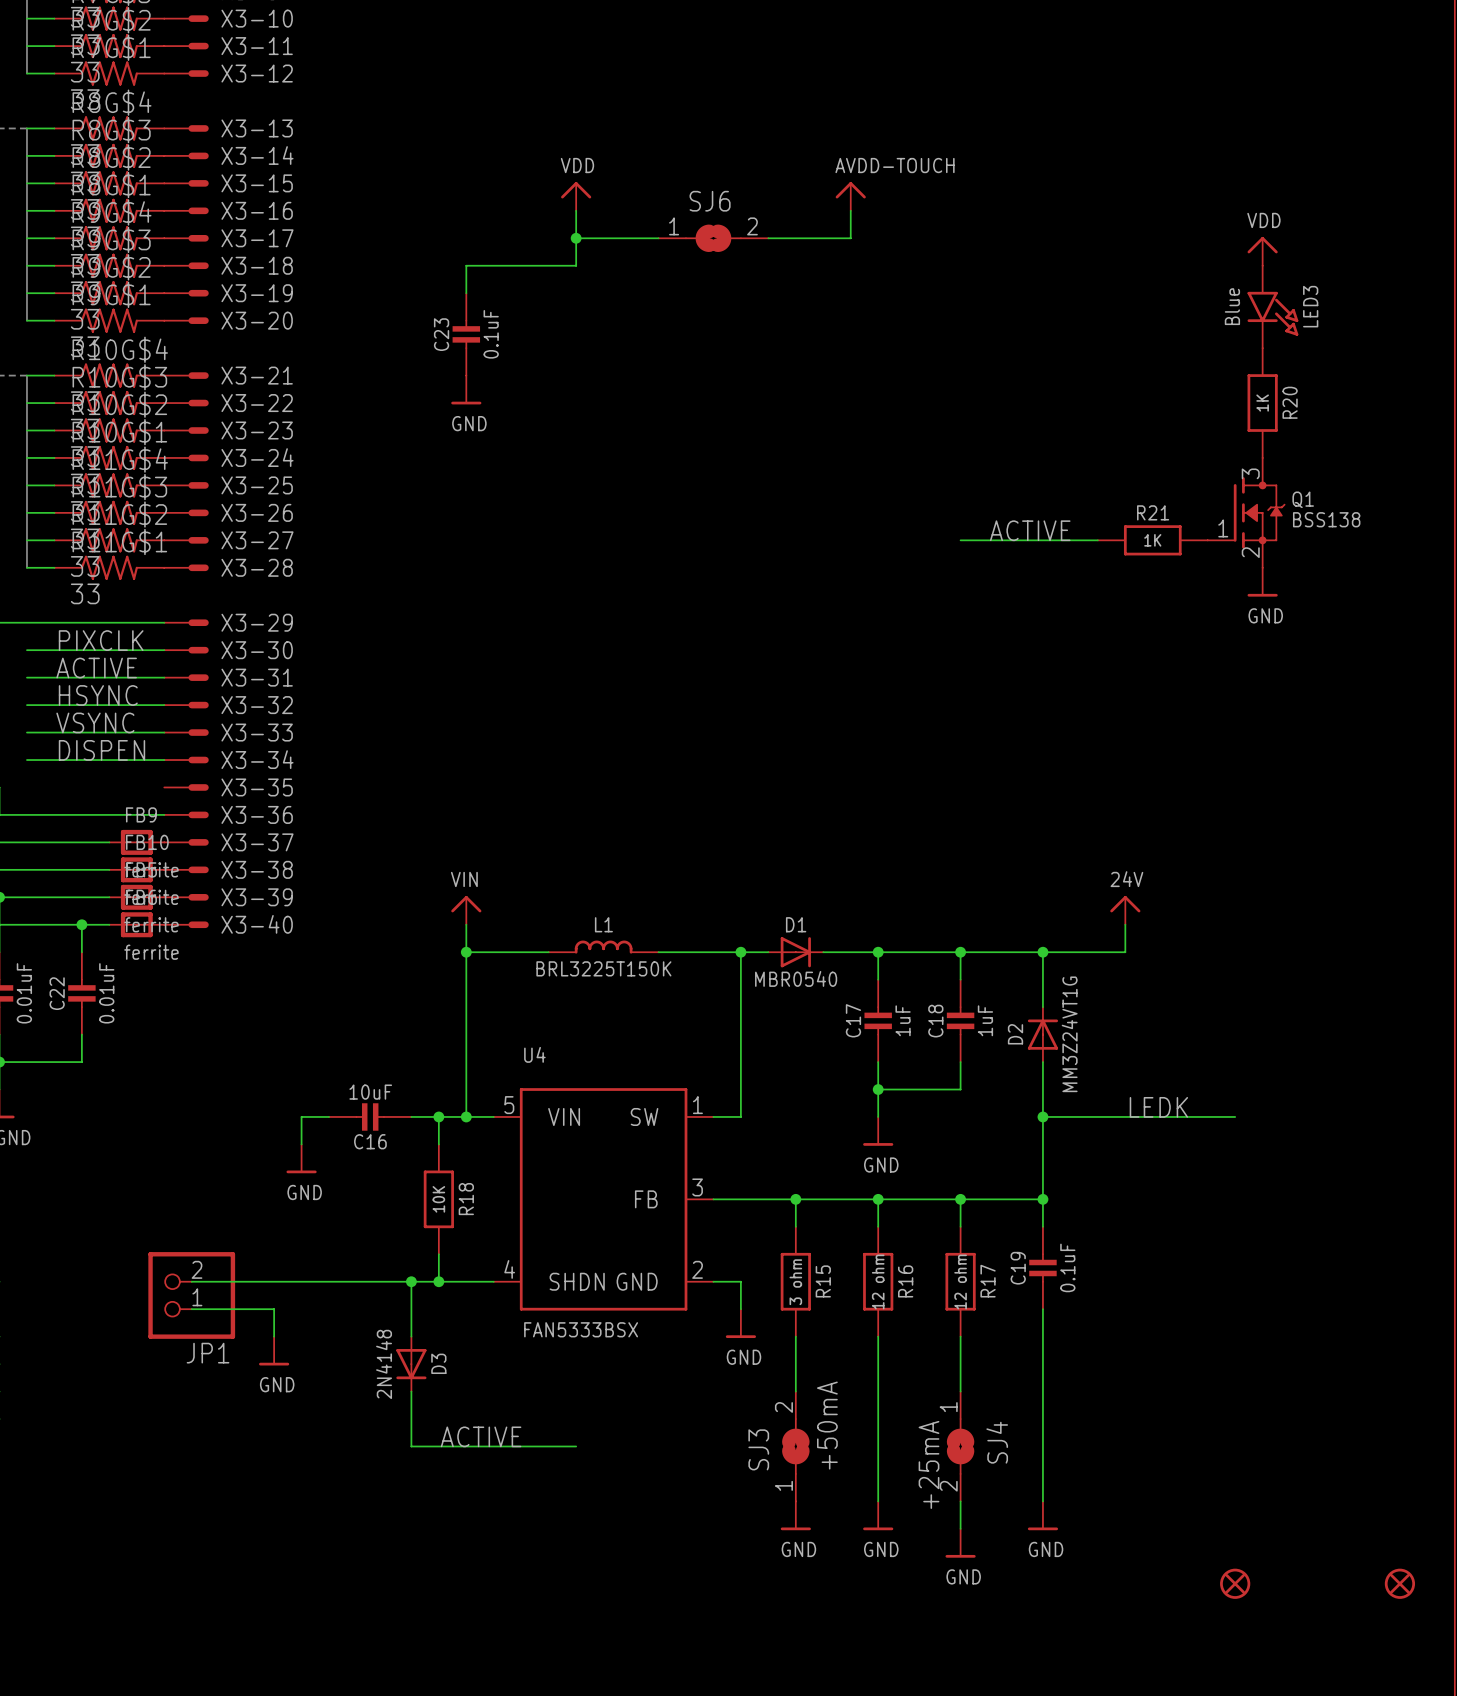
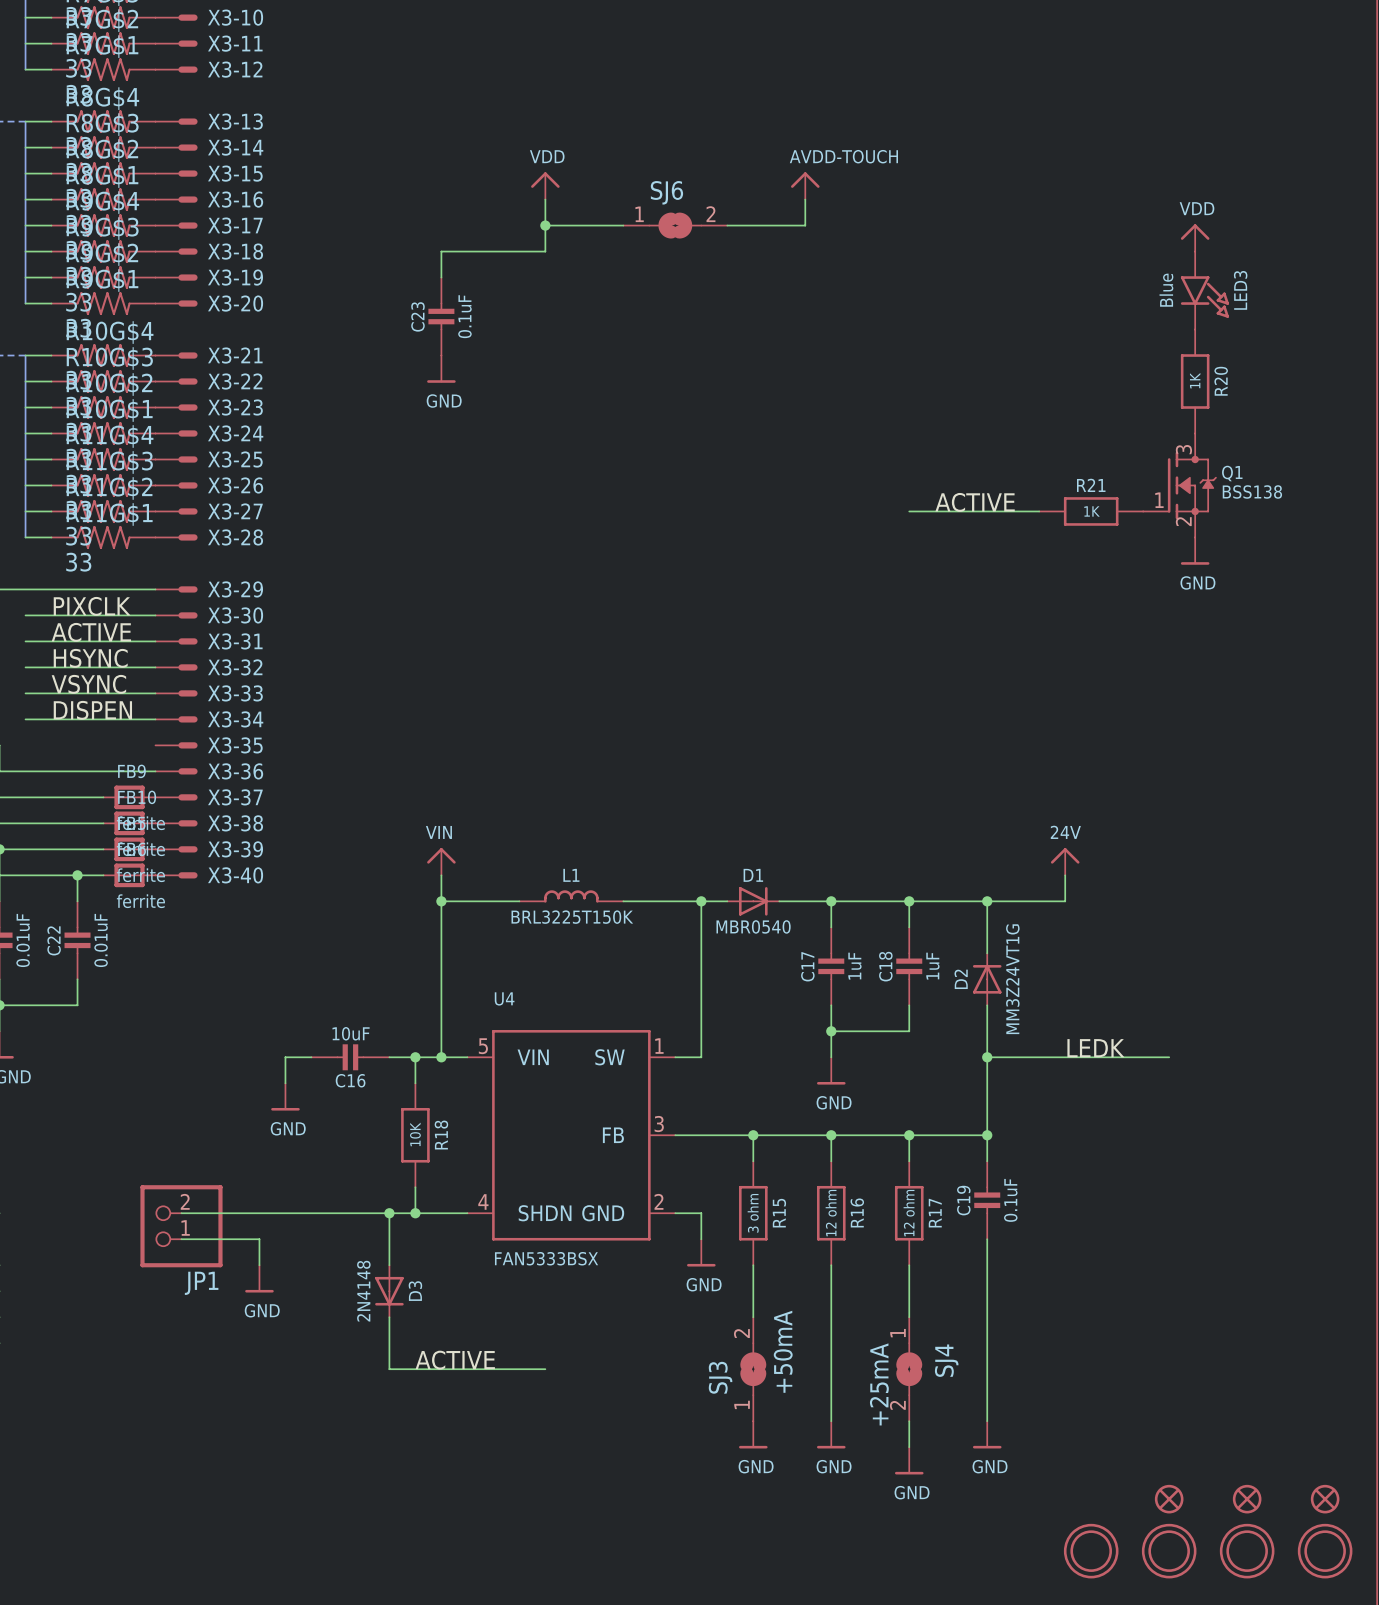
part: none -> (1247, 1499)
part: none -> (1091, 1551)
part: none -> (1169, 1551)
part: none -> (1247, 1551)
part: none -> (1325, 1551)

